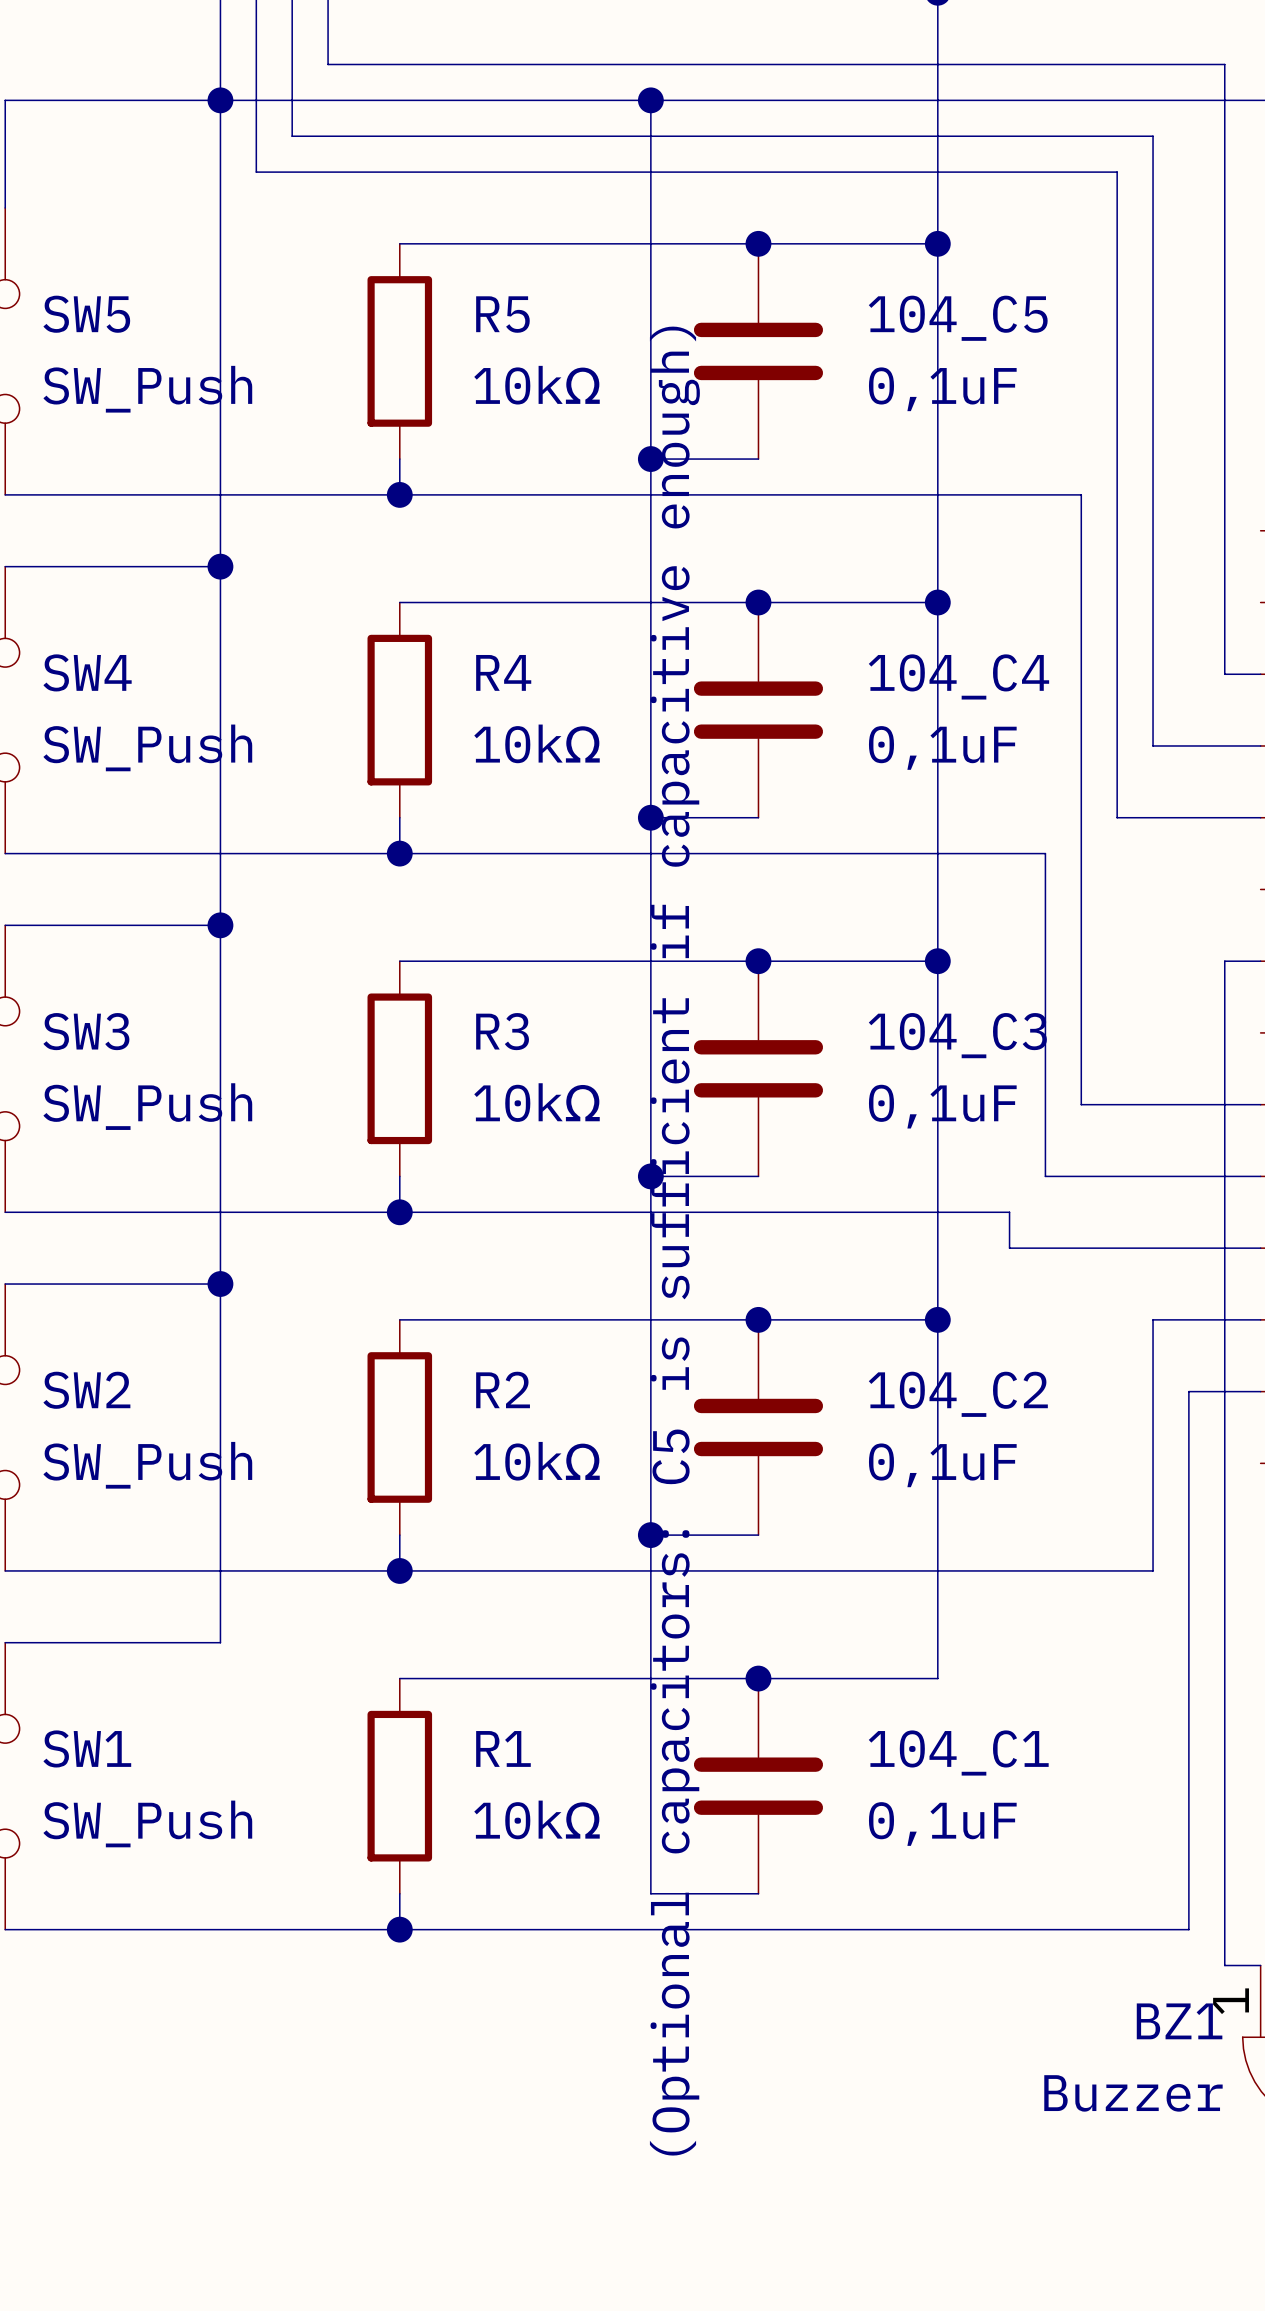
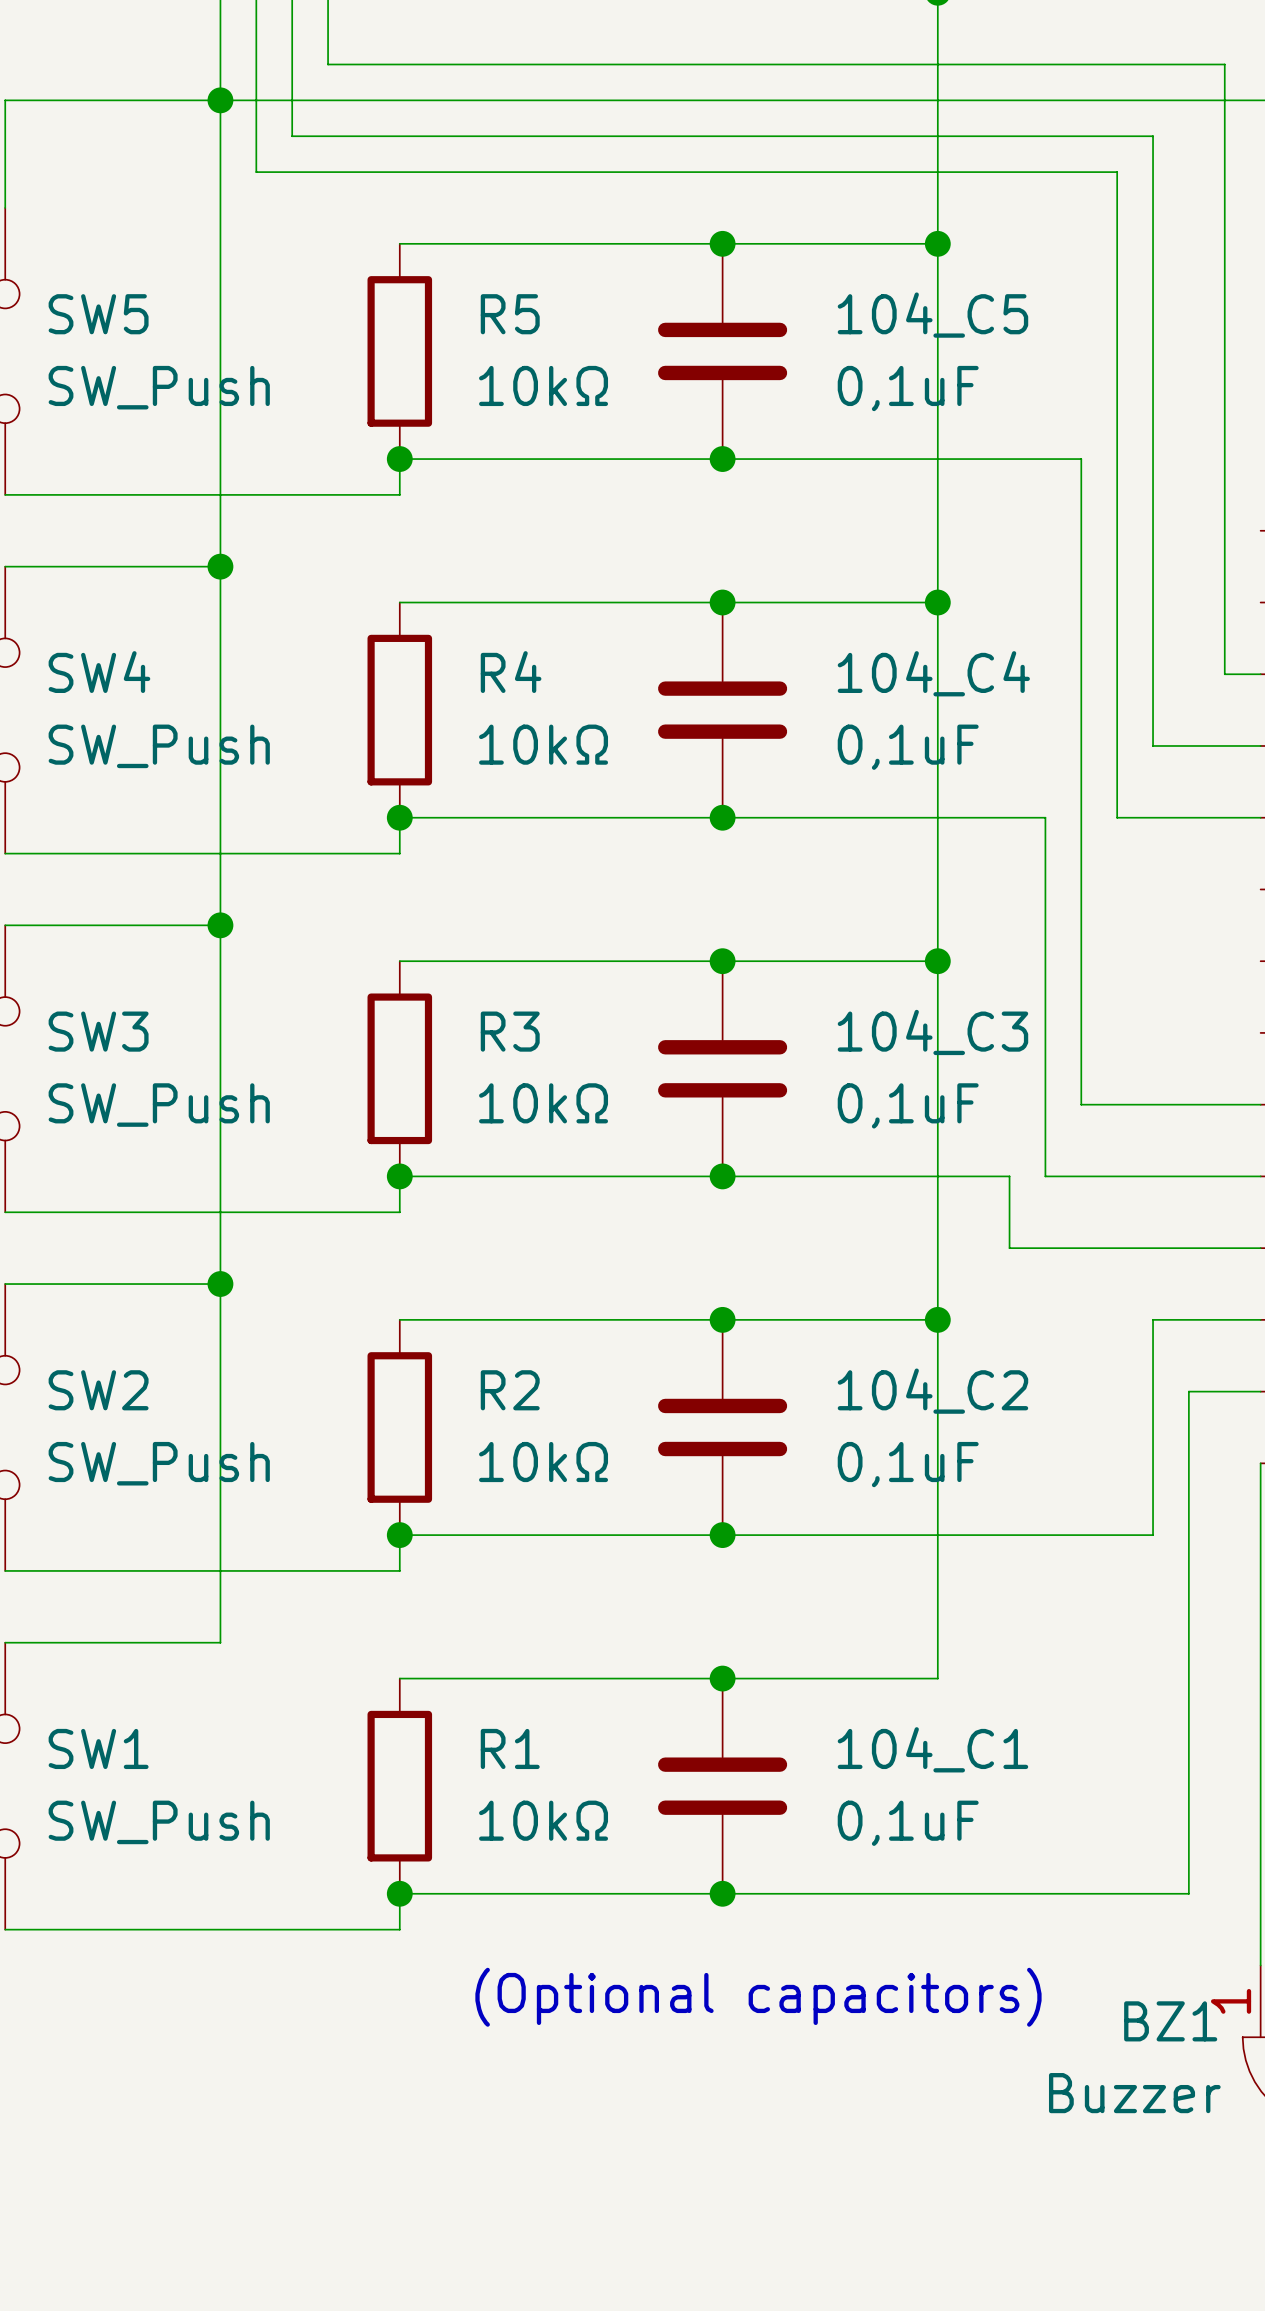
wire: (650, 100) (650, 1893) -> (399, 1893) (650, 1893)
junction: (650, 100) -> none
junction position: (758, 243) -> (722, 243)
104_C5 position: (758, 351) -> (722, 351)
wire: none -> (399, 459) (650, 459)
junction position: (650, 459) -> (722, 459)
wire: (399, 494) (1081, 494) -> (758, 459) (1081, 459) (1081, 494)
junction position: (399, 494) -> (399, 459)
junction position: (758, 602) -> (722, 602)
104_C4 position: (758, 710) -> (722, 710)
wire: none -> (399, 817) (650, 817)
junction position: (650, 817) -> (722, 817)
wire: (399, 853) (1045, 853) -> (758, 817) (1045, 817) (1045, 853)
junction position: (399, 853) -> (399, 817)
junction position: (758, 961) -> (722, 961)
wire: (1260, 961) (1224, 961) (1224, 1965) (1260, 1965) -> (1260, 1463) (1260, 1965)
104_C3 position: (758, 1068) -> (722, 1068)
wire: none -> (399, 1176) (650, 1176)
junction position: (650, 1176) -> (722, 1176)
wire: (399, 1212) (1009, 1212) -> (758, 1176) (1009, 1176) (1009, 1212)
junction position: (399, 1212) -> (399, 1176)
text: (Optional capacitors: C5 is sufficient if capacitive enough) (674, 1241) -> none
junction position: (758, 1319) -> (722, 1319)
104_C2 position: (758, 1427) -> (722, 1427)
wire: none -> (399, 1535) (650, 1535)
junction position: (650, 1535) -> (722, 1535)
wire: (1153, 1535) (1153, 1570) (399, 1570) -> (1153, 1535) (758, 1535)
junction position: (399, 1570) -> (399, 1535)
junction position: (758, 1678) -> (722, 1678)
104_C1 position: (758, 1786) -> (722, 1786)
junction: none -> (722, 1893)
wire: (1188, 1893) (1188, 1929) (399, 1929) -> (1188, 1893) (758, 1893)
junction position: (399, 1929) -> (399, 1893)
text: none -> (Optional capacitors) (758, 1997)

